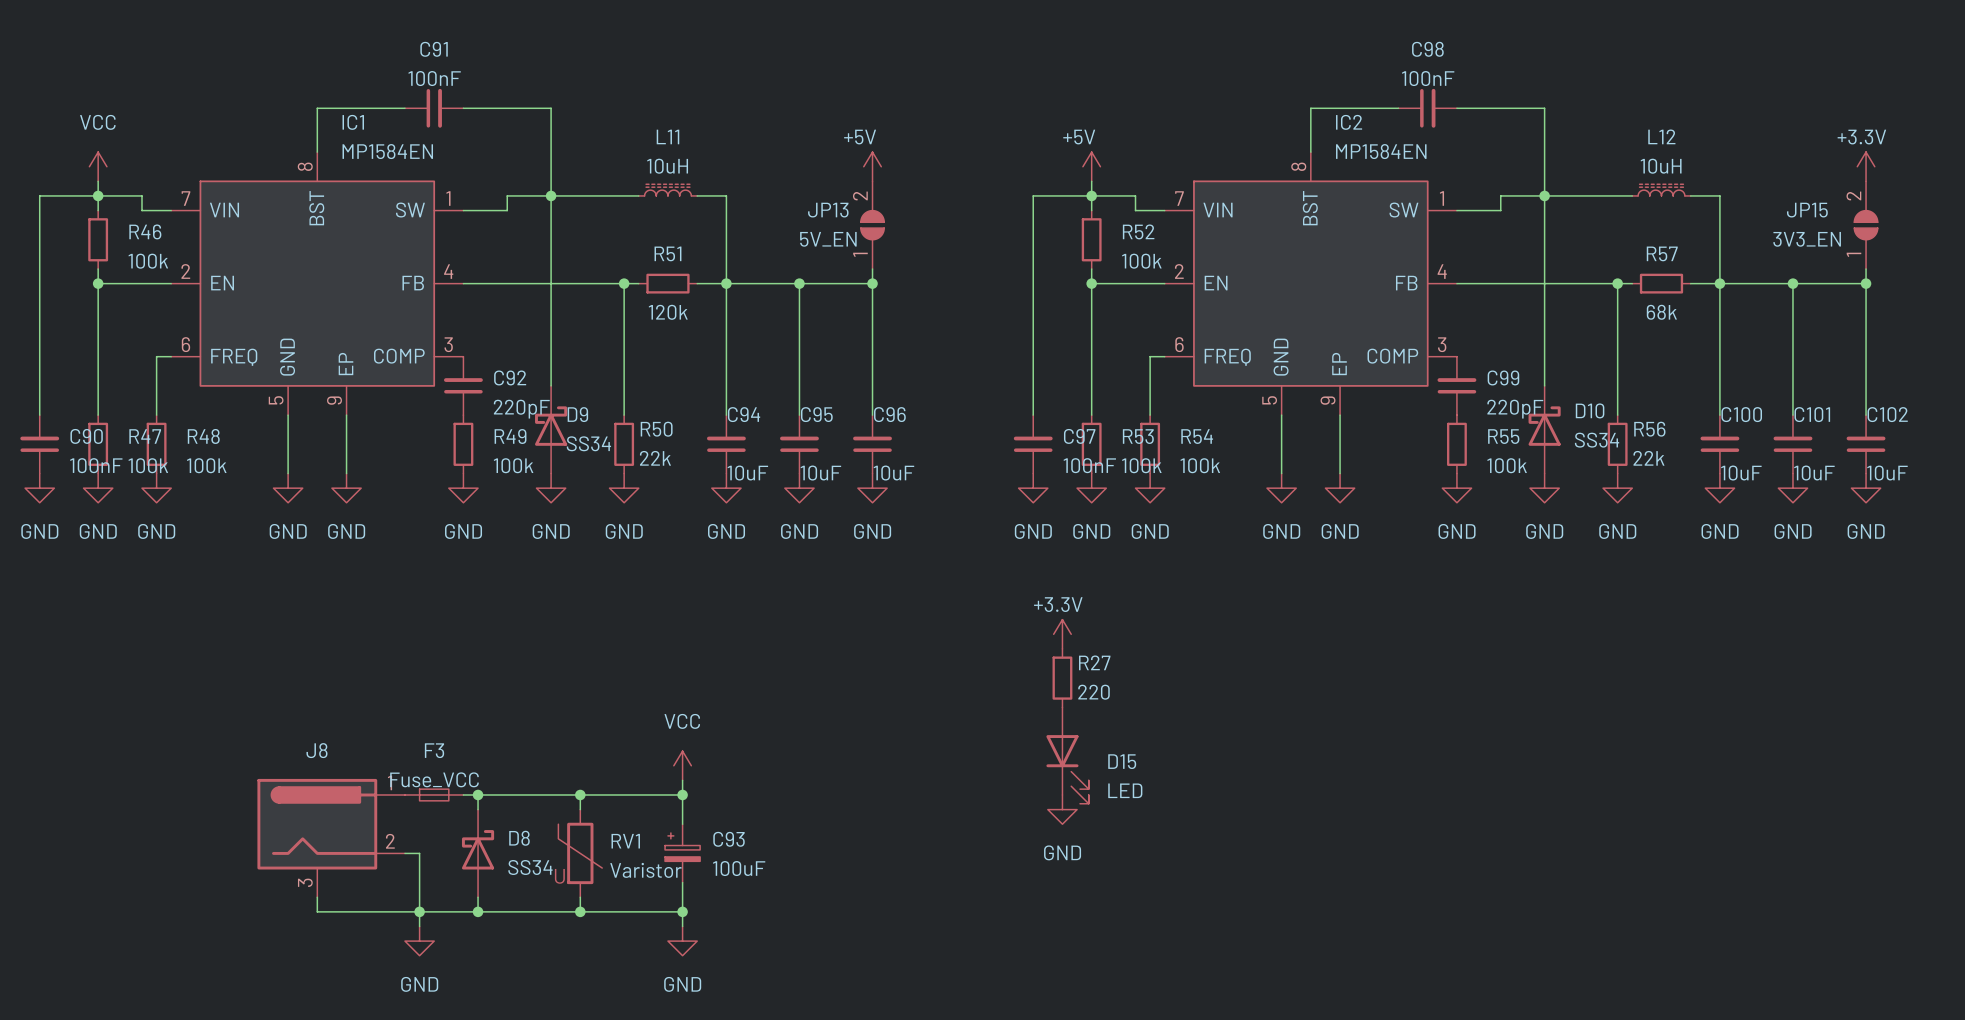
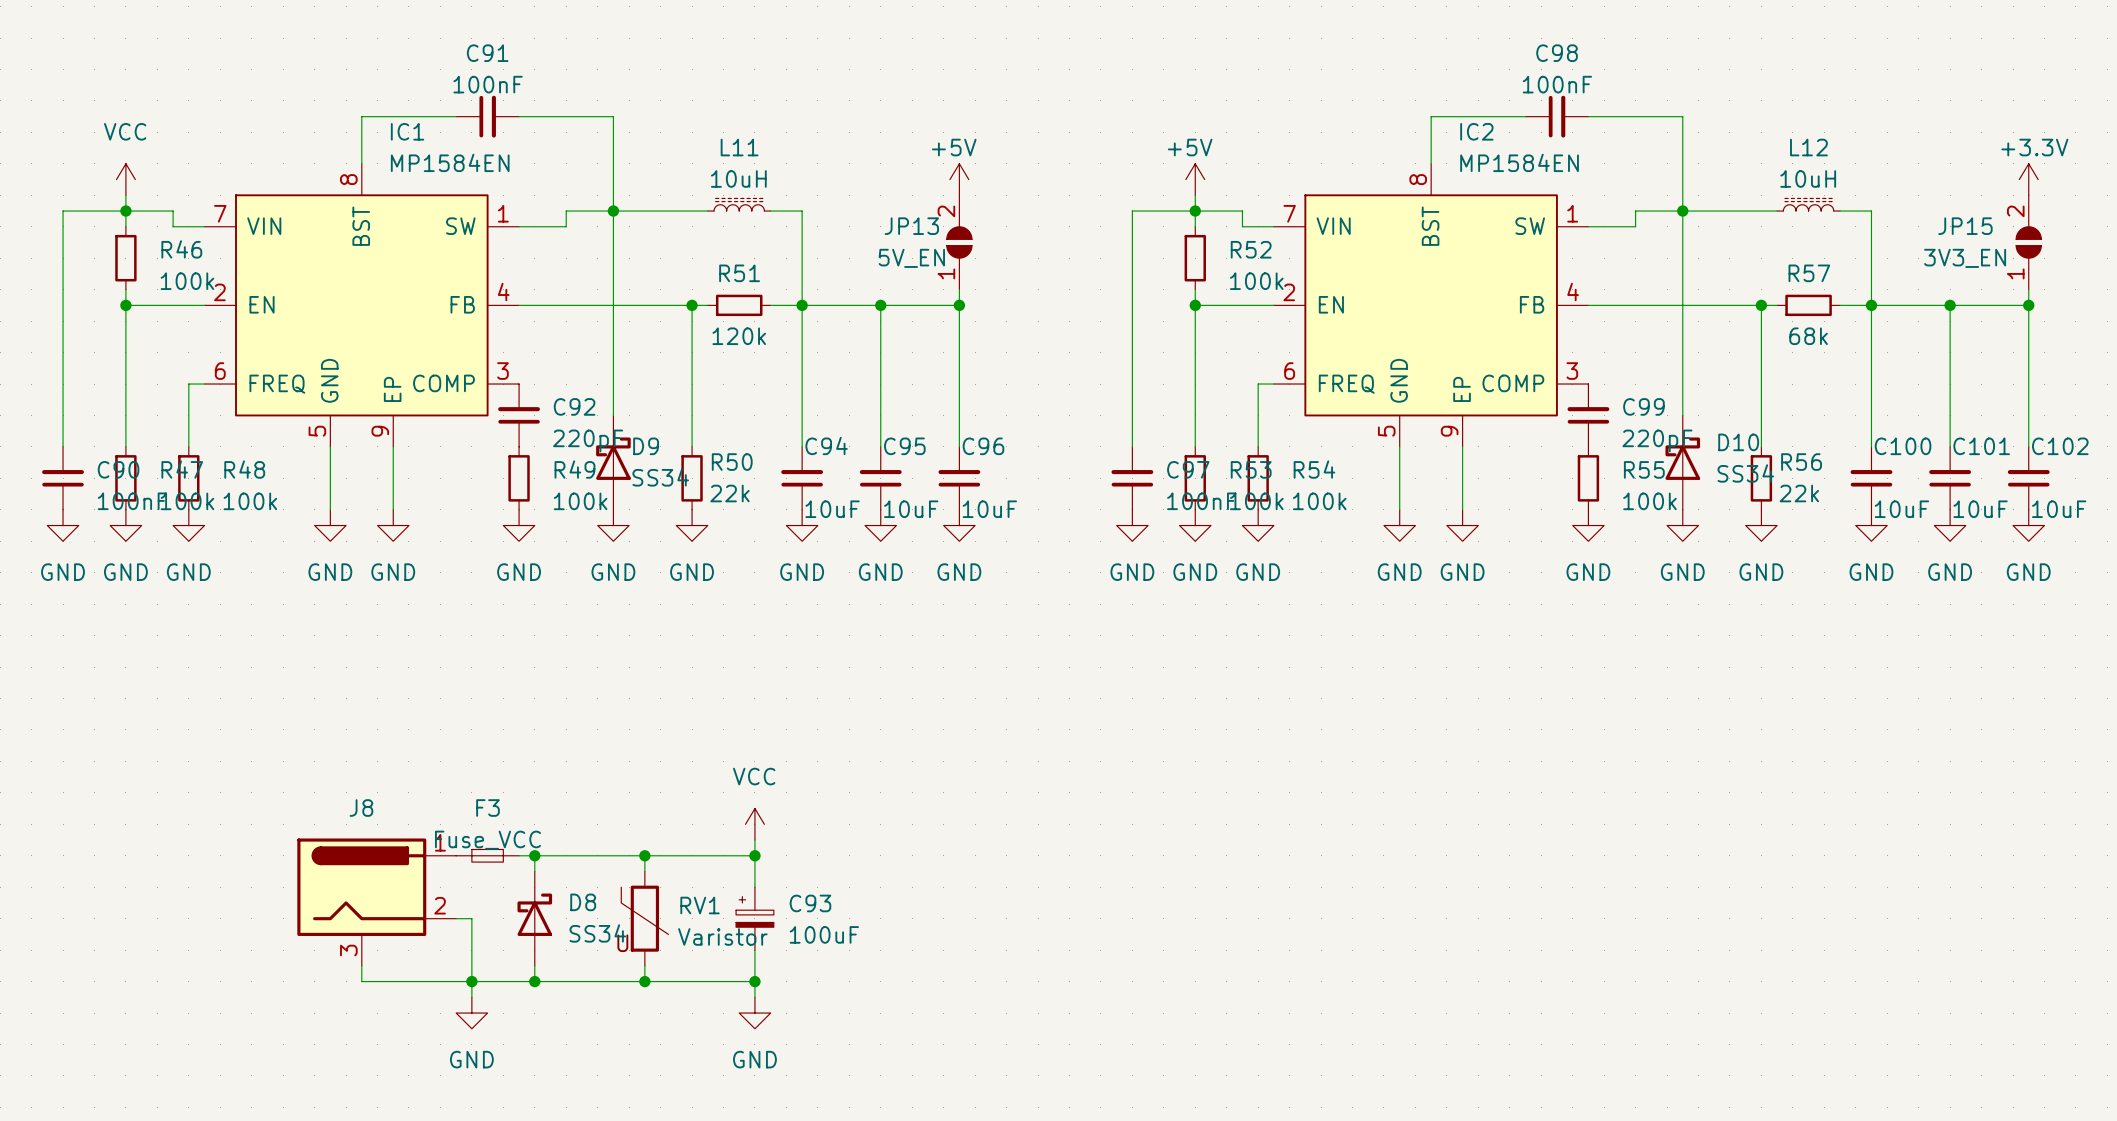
power symbol: +3.3V (1062, 634) -> none
R27: 220 (1062, 678) -> none
D15: LED (1067, 755) -> none
power symbol: GND (1062, 809) -> none

